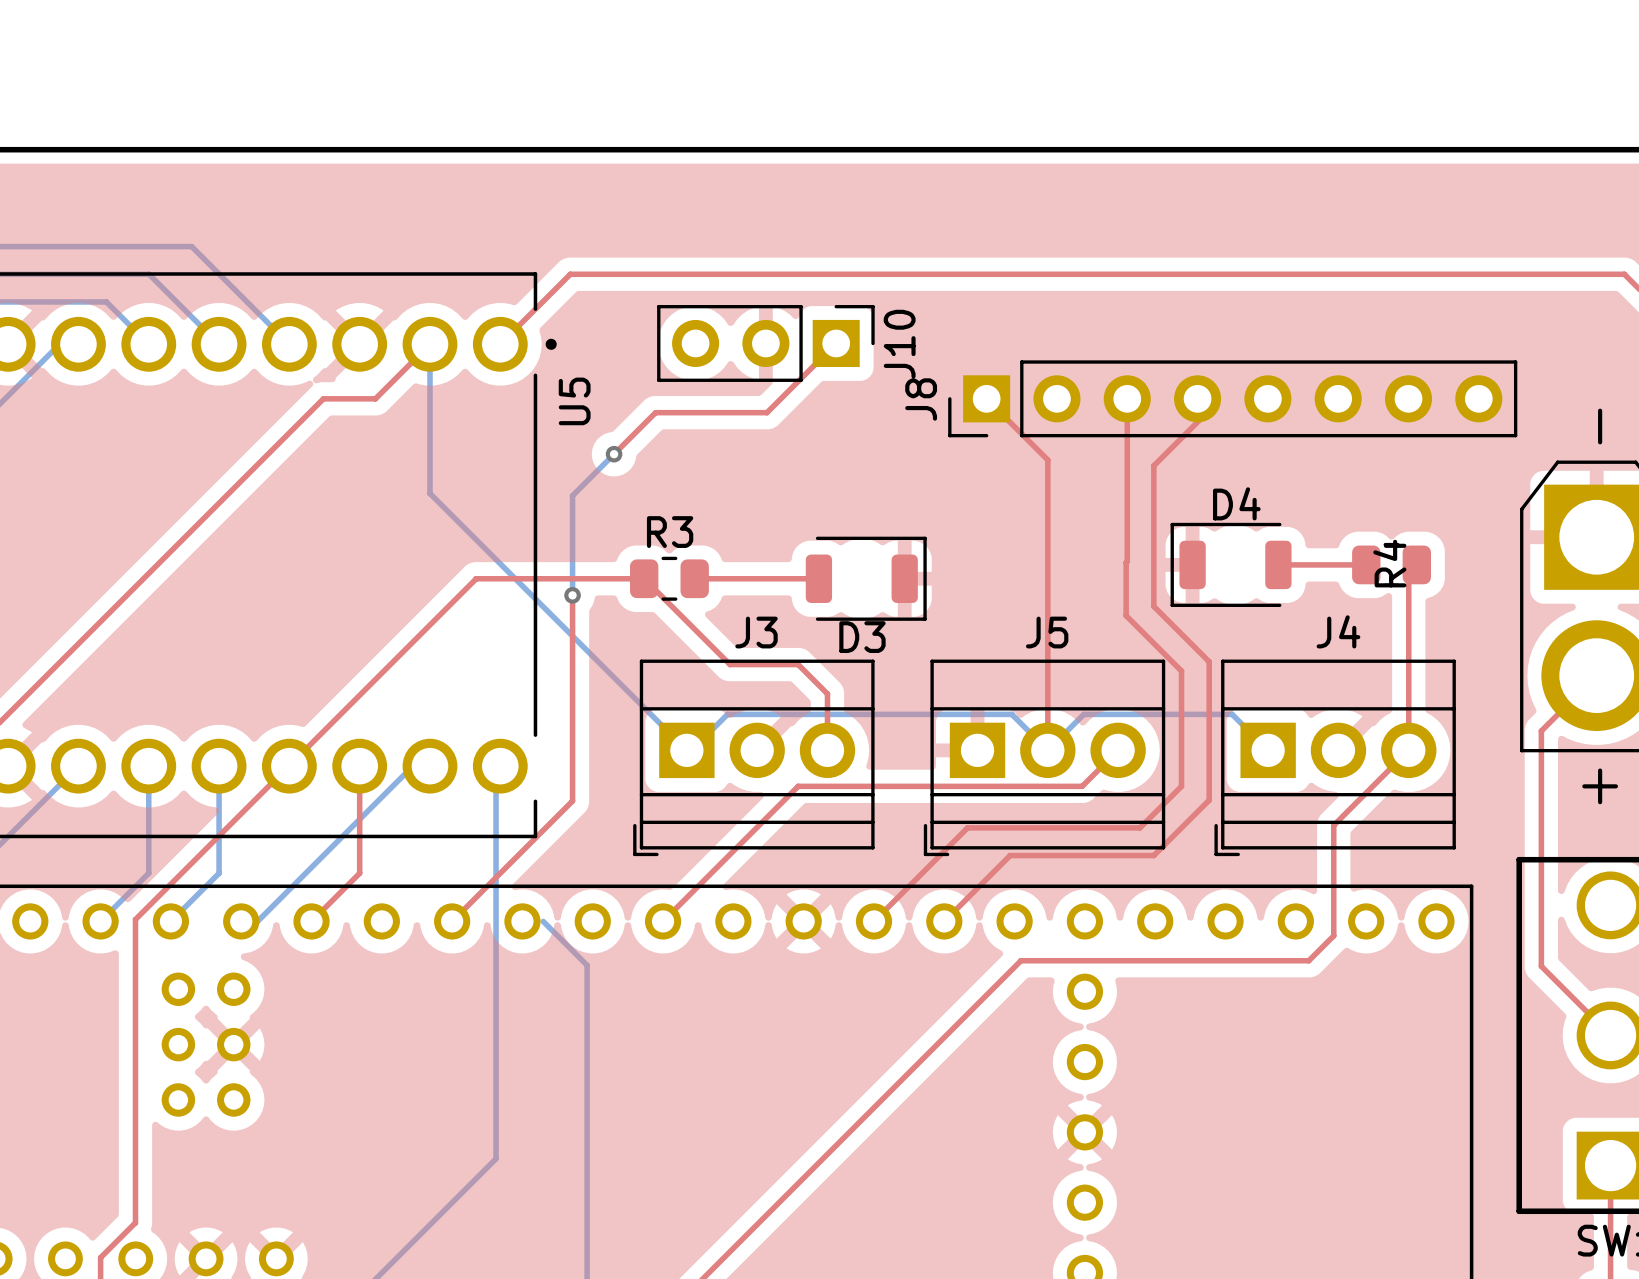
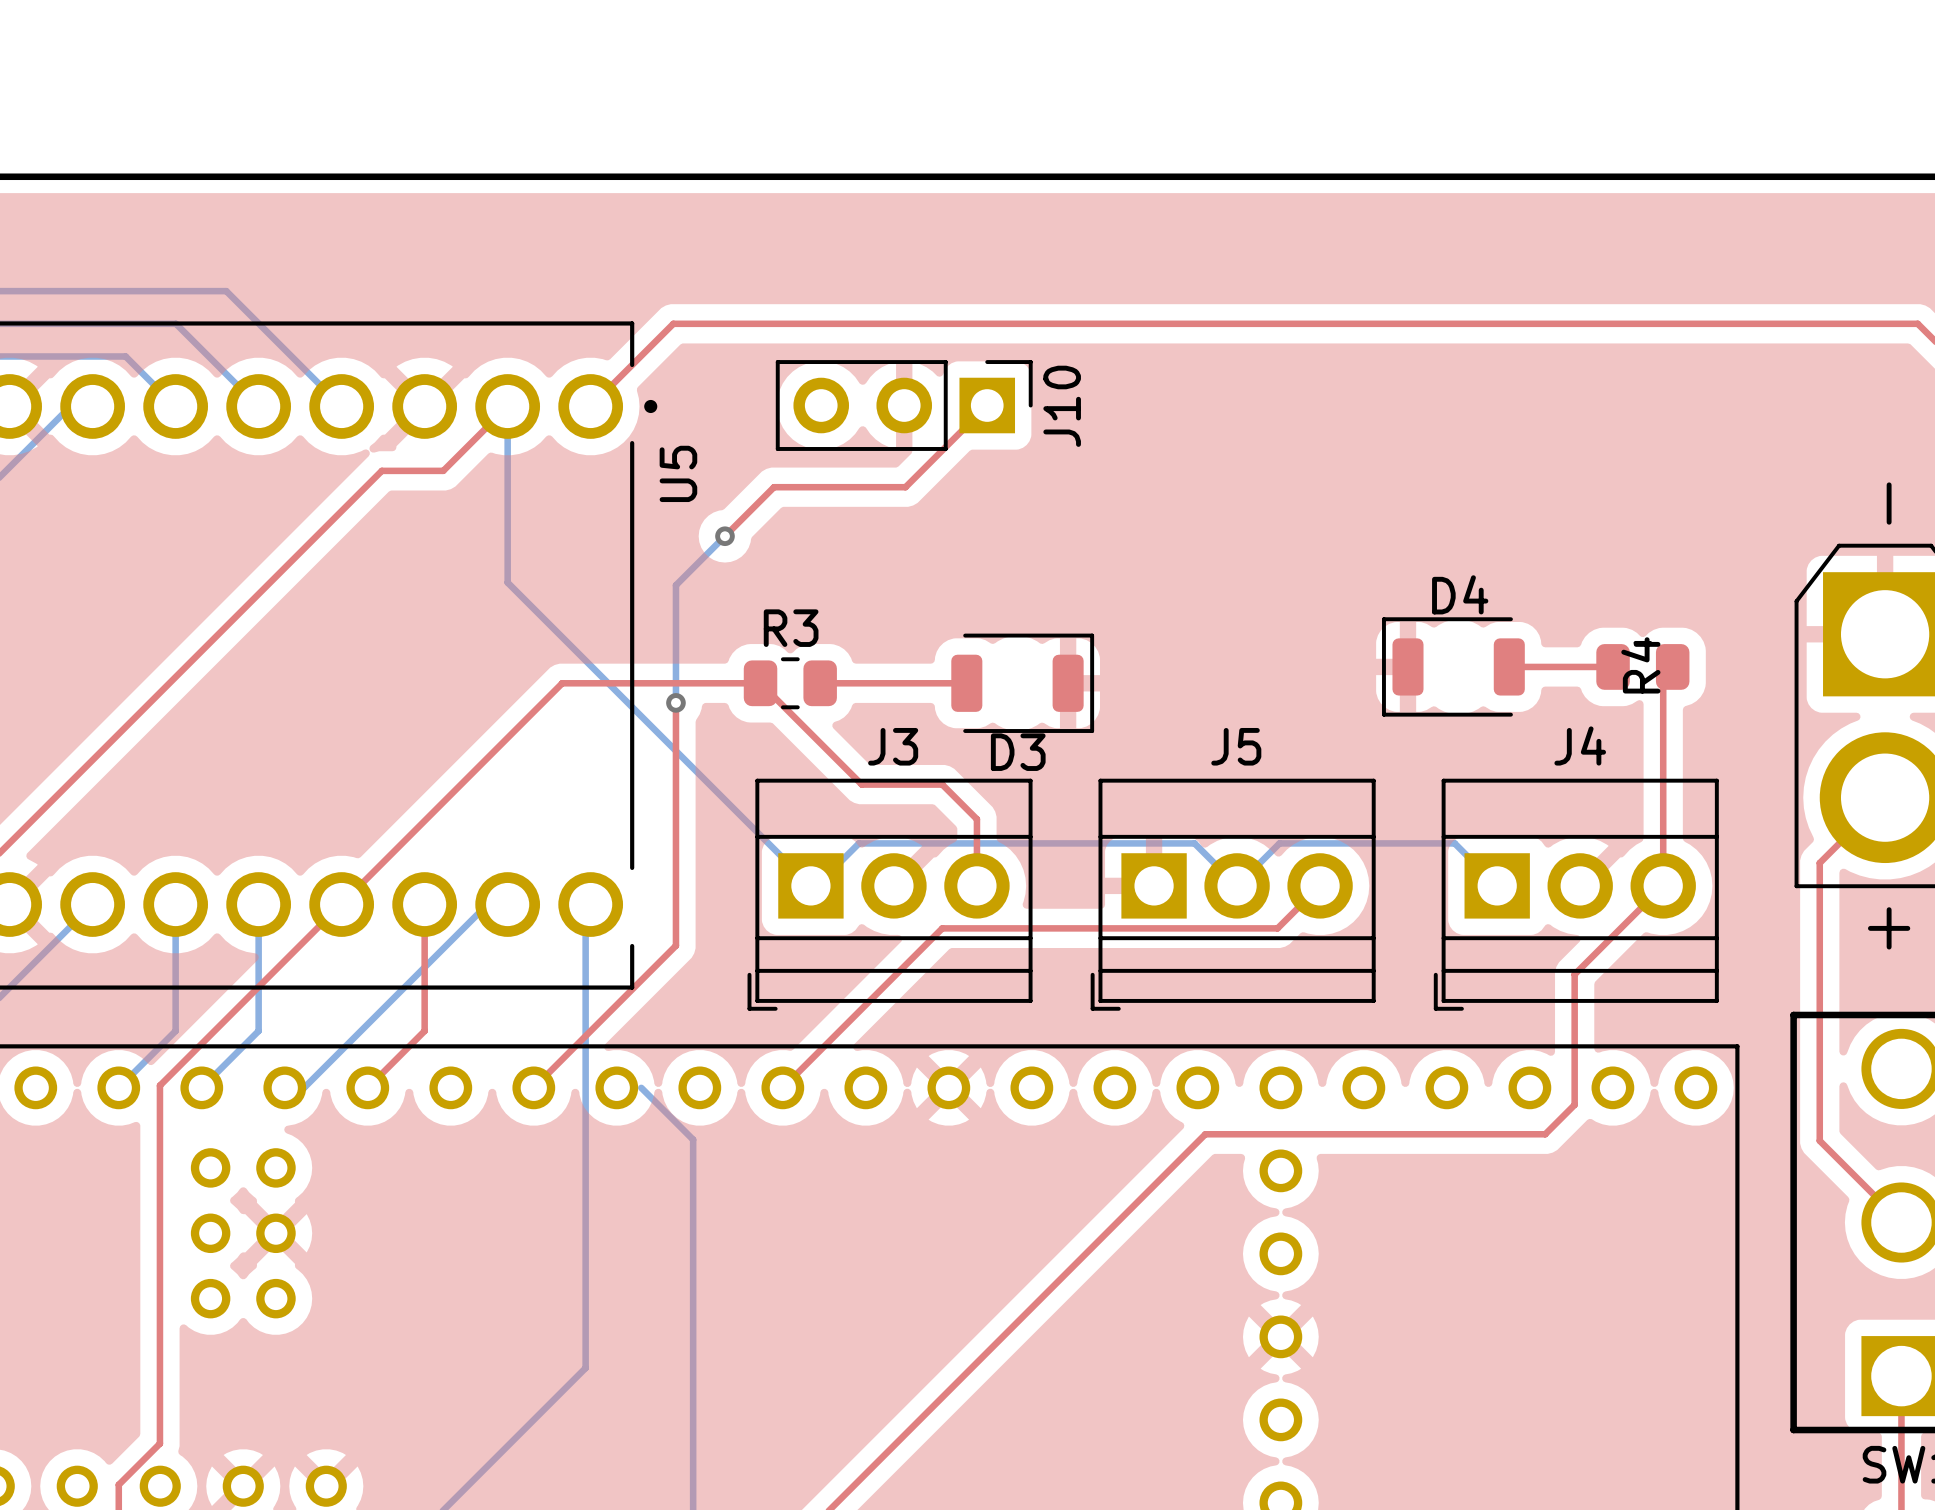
top track: (986, 398) (1047, 460) (1047, 750) -> none
top track: (1127, 398) (1126, 615) (1181, 671) (1181, 786) (1140, 827) (967, 827) (873, 921) -> none
top track: (1197, 398) (1209, 410) (1153, 465) (1153, 606) (1209, 661) (1209, 800) (1153, 855) (1010, 855) (944, 921) -> none
J8: (1232, 398) -> none

